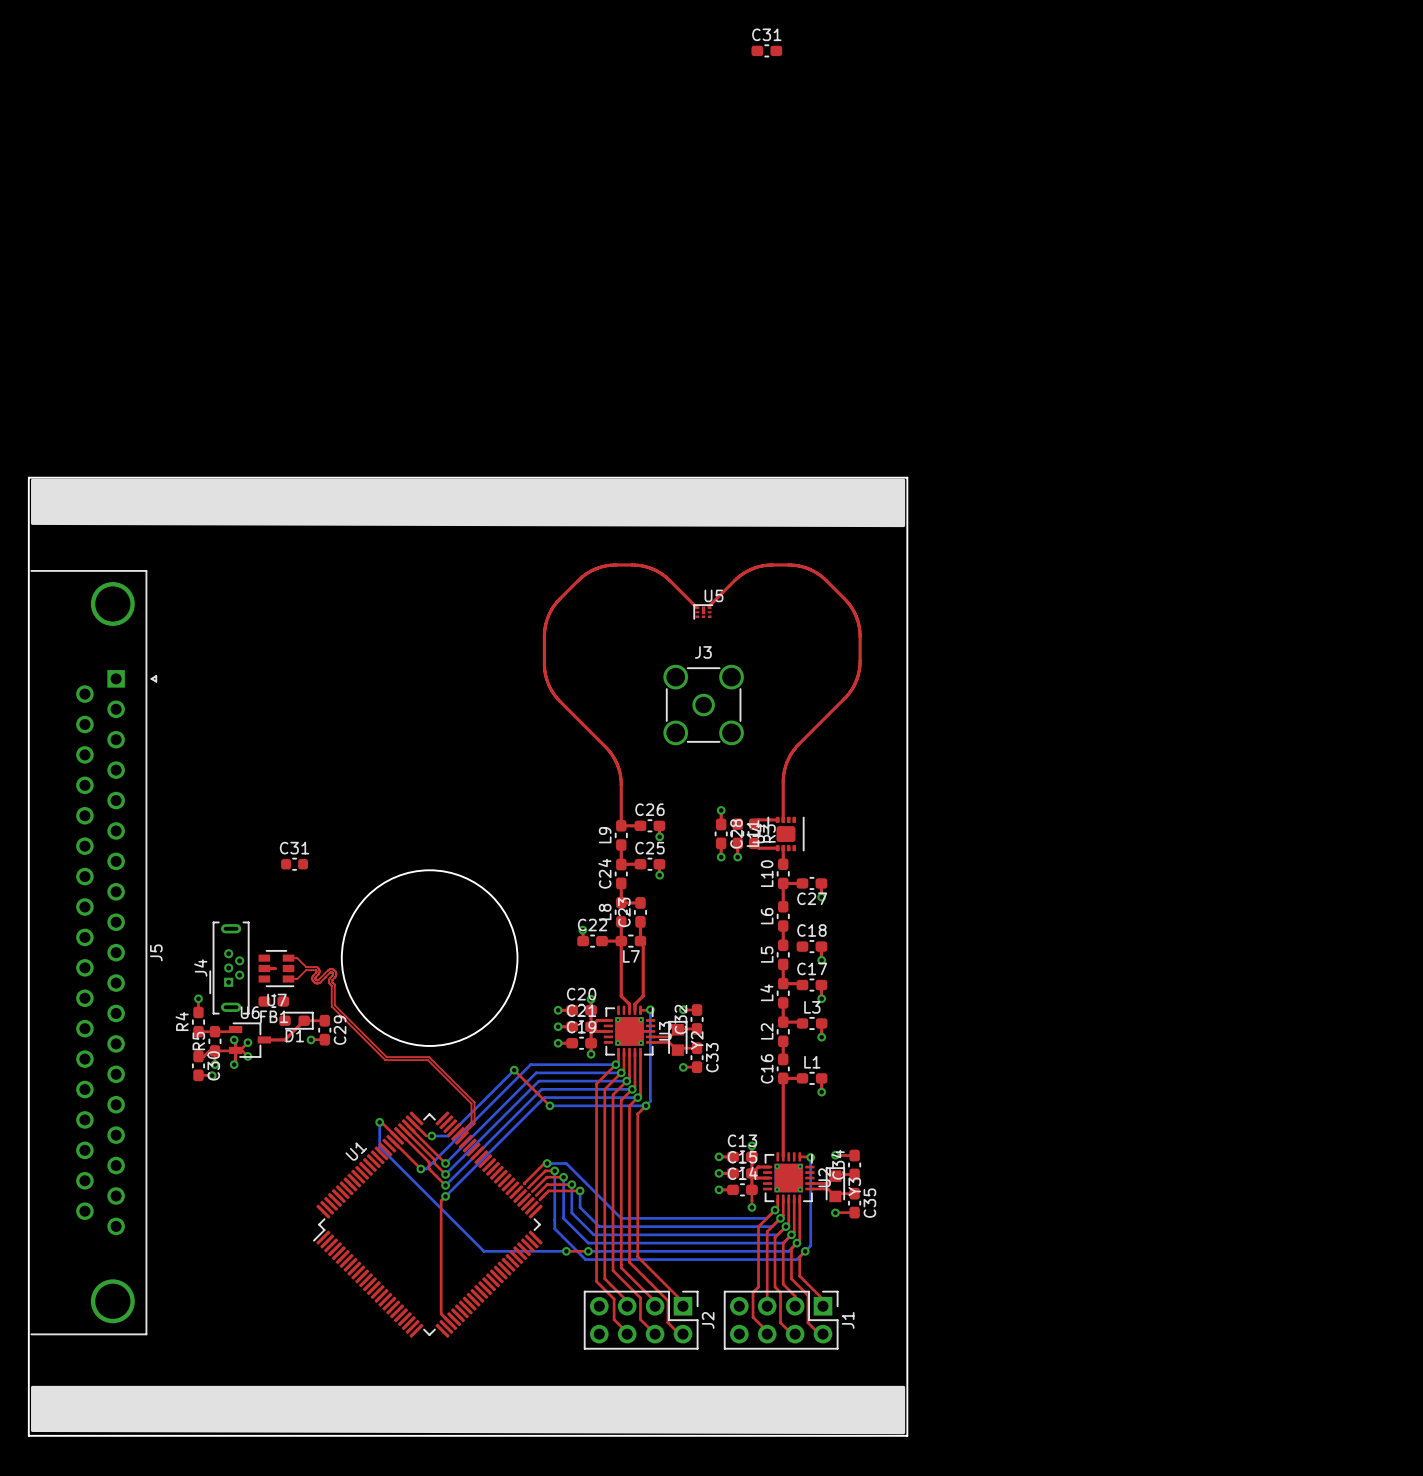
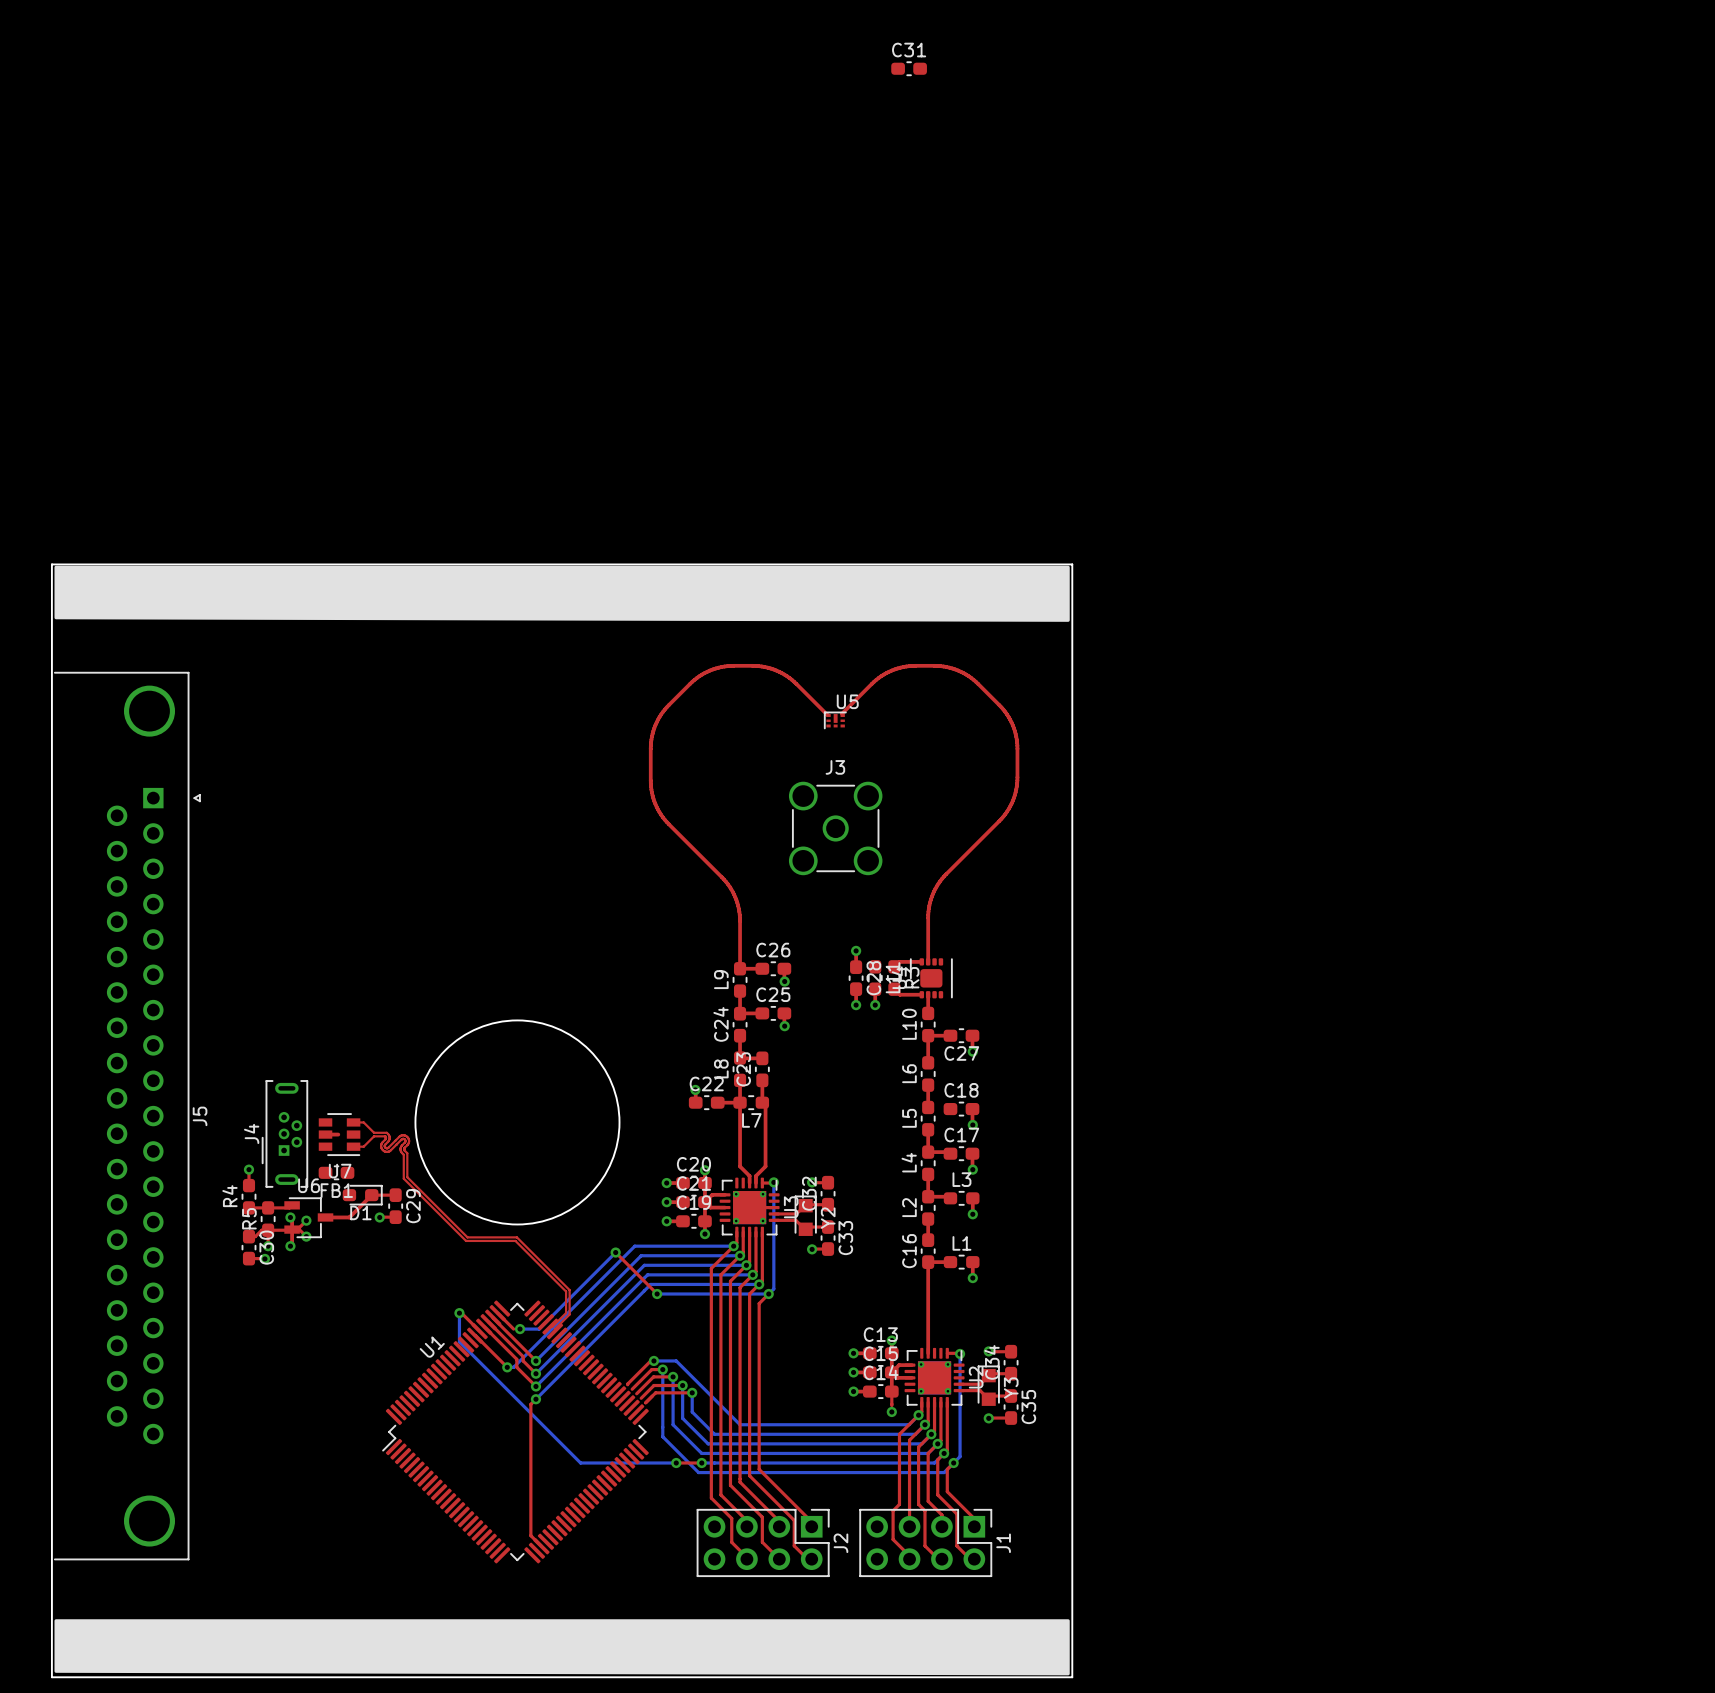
C31: (294, 864) -> none

